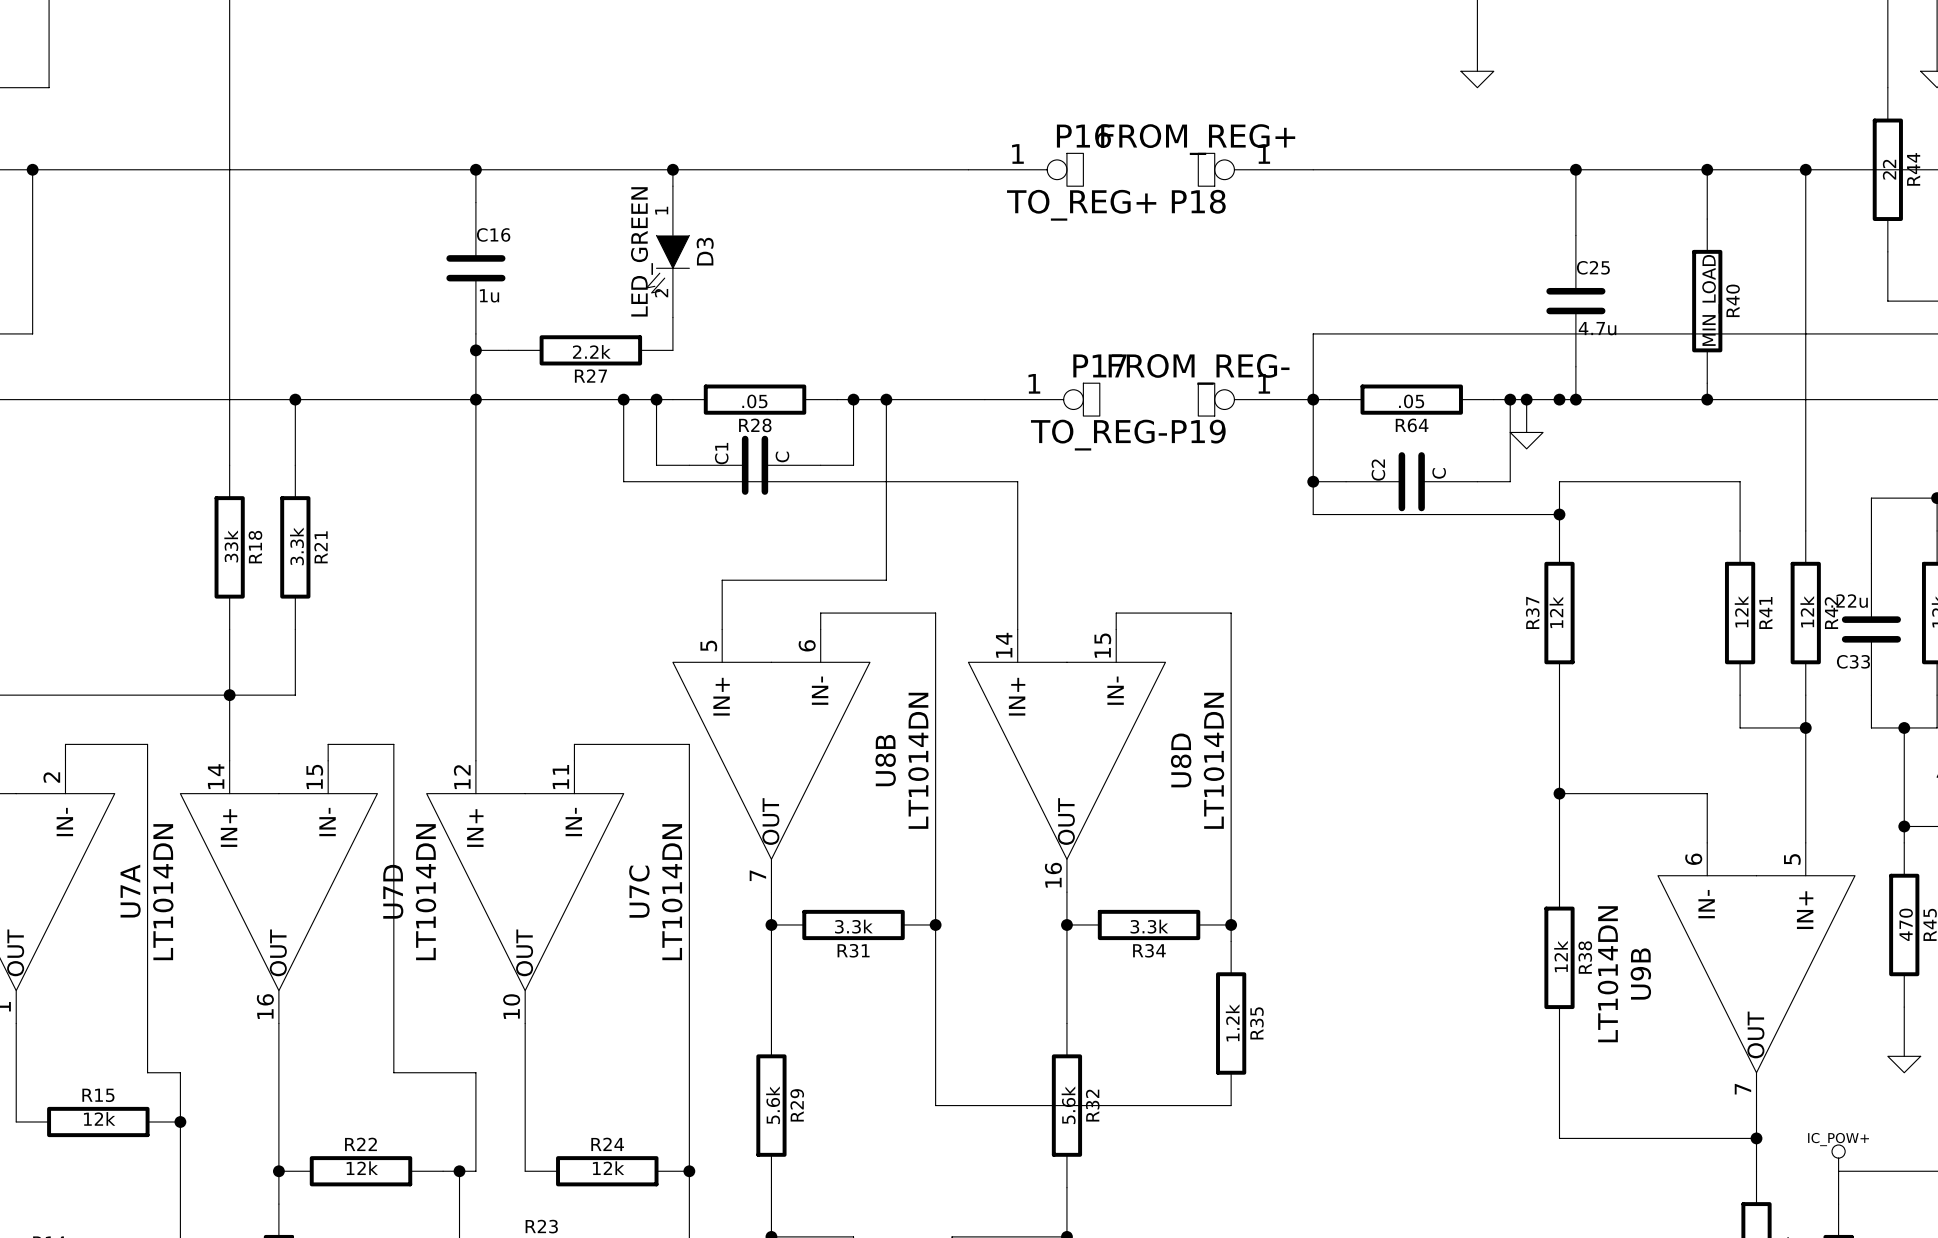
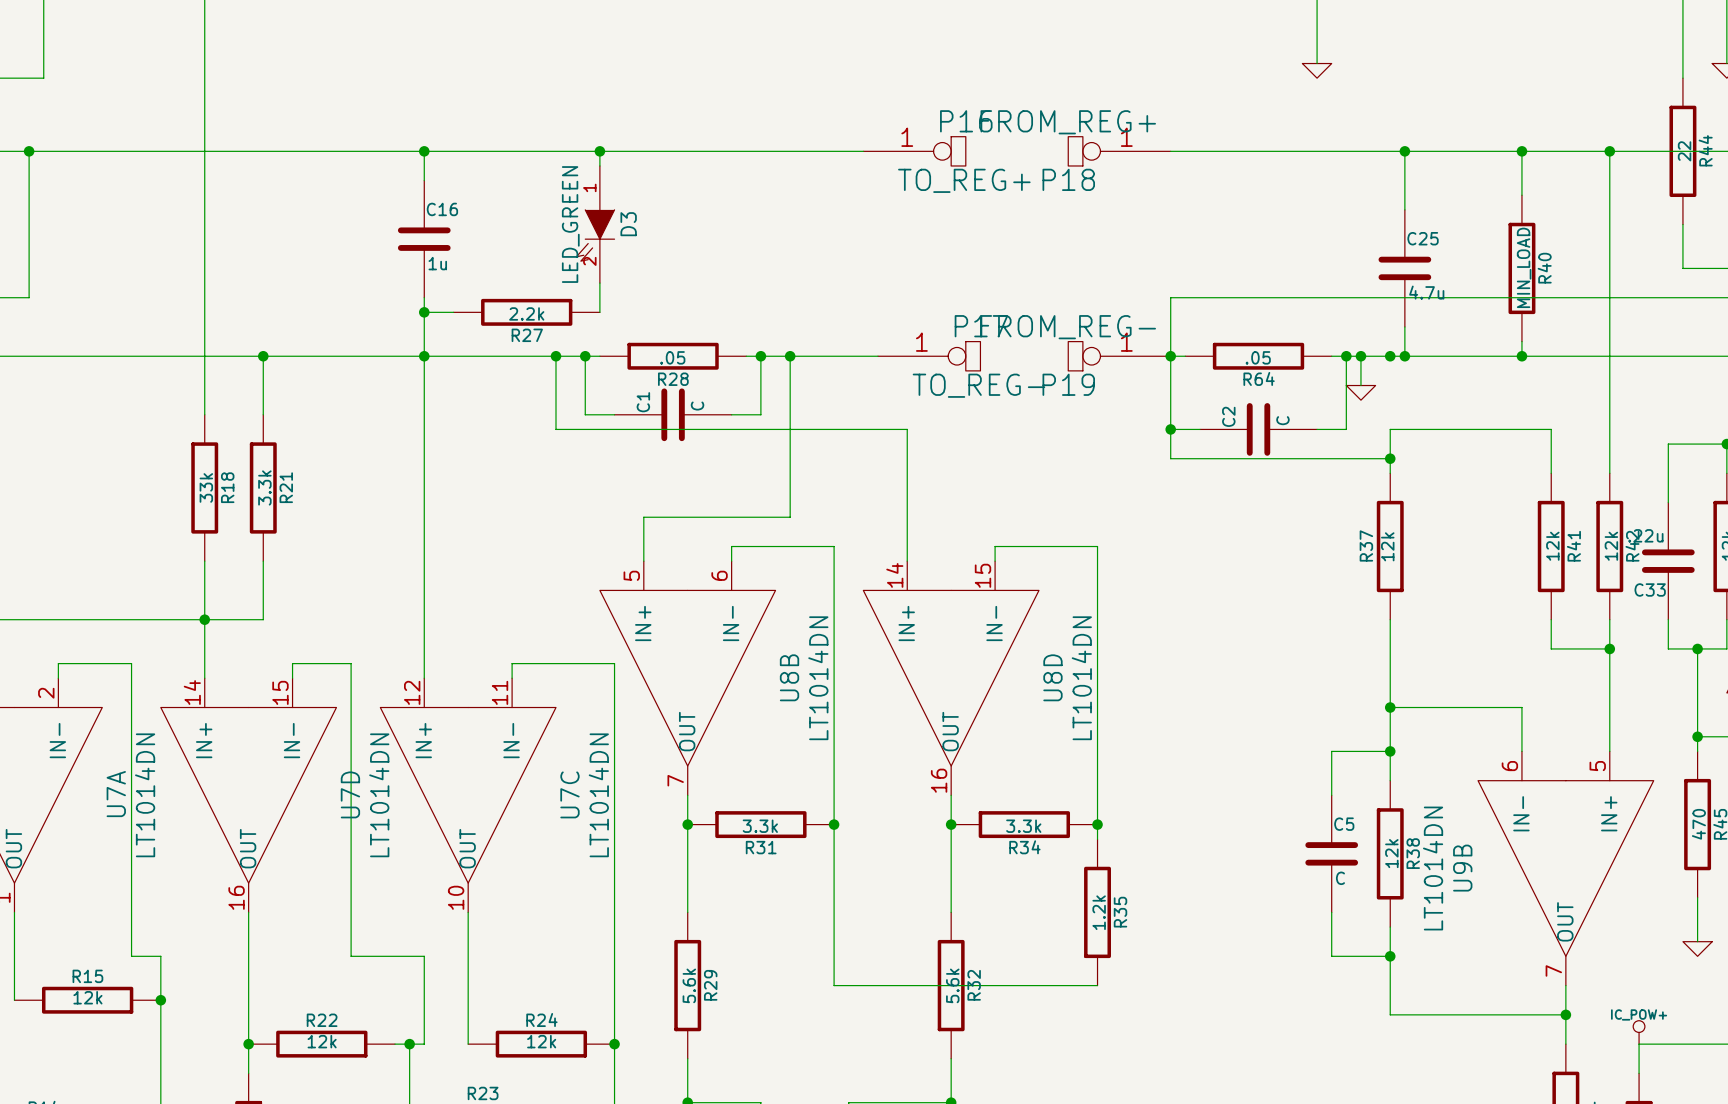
wire: none -> (1390, 751) (1331, 751) (1331, 795)
junction: none -> (1390, 751)
C5: none -> C (1331, 853)
wire: none -> (1331, 912) (1331, 956) (1390, 956)
junction: none -> (1390, 956)

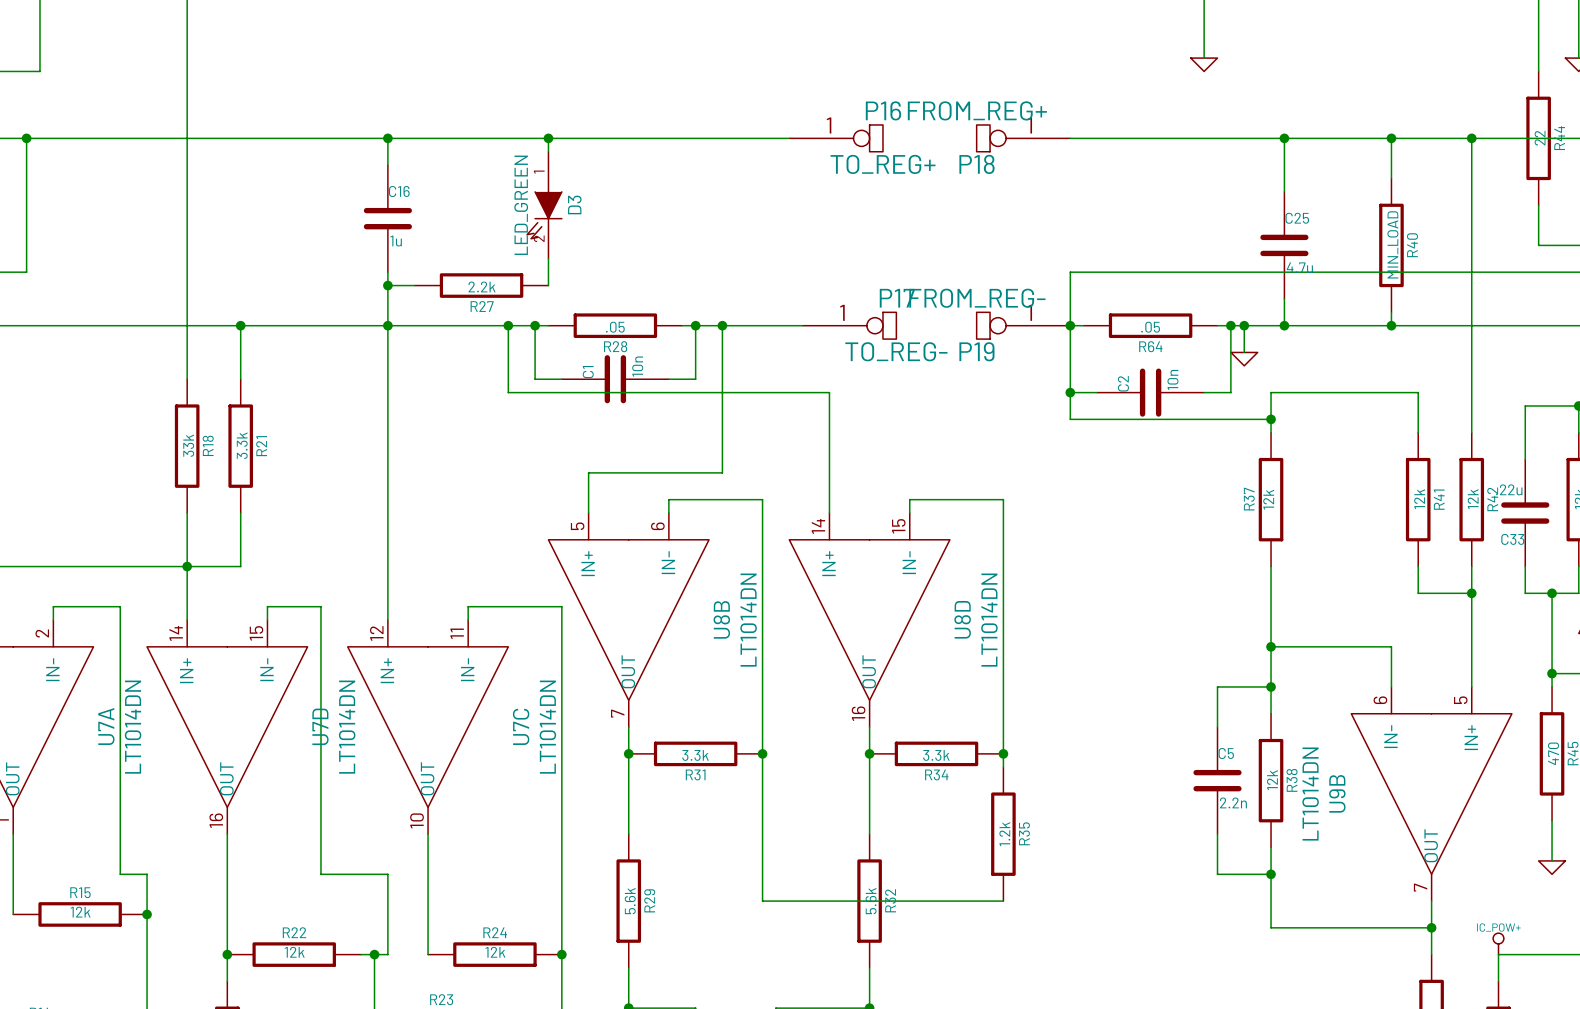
junction: (1390, 356) -> none
C1 value: C (697, 406) -> 10n (637, 366)
C2 value: C (1282, 420) -> 10n (1172, 380)
C5 value: C (1340, 878) -> 2.2n (1233, 802)

